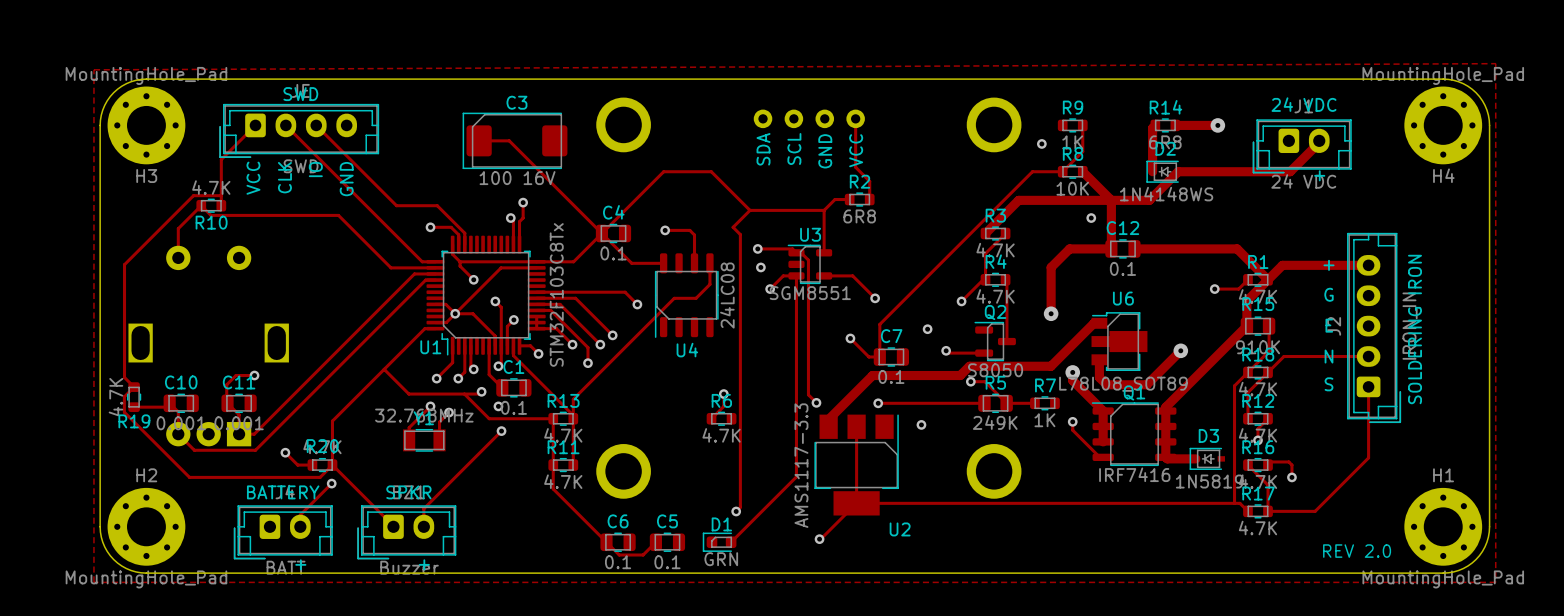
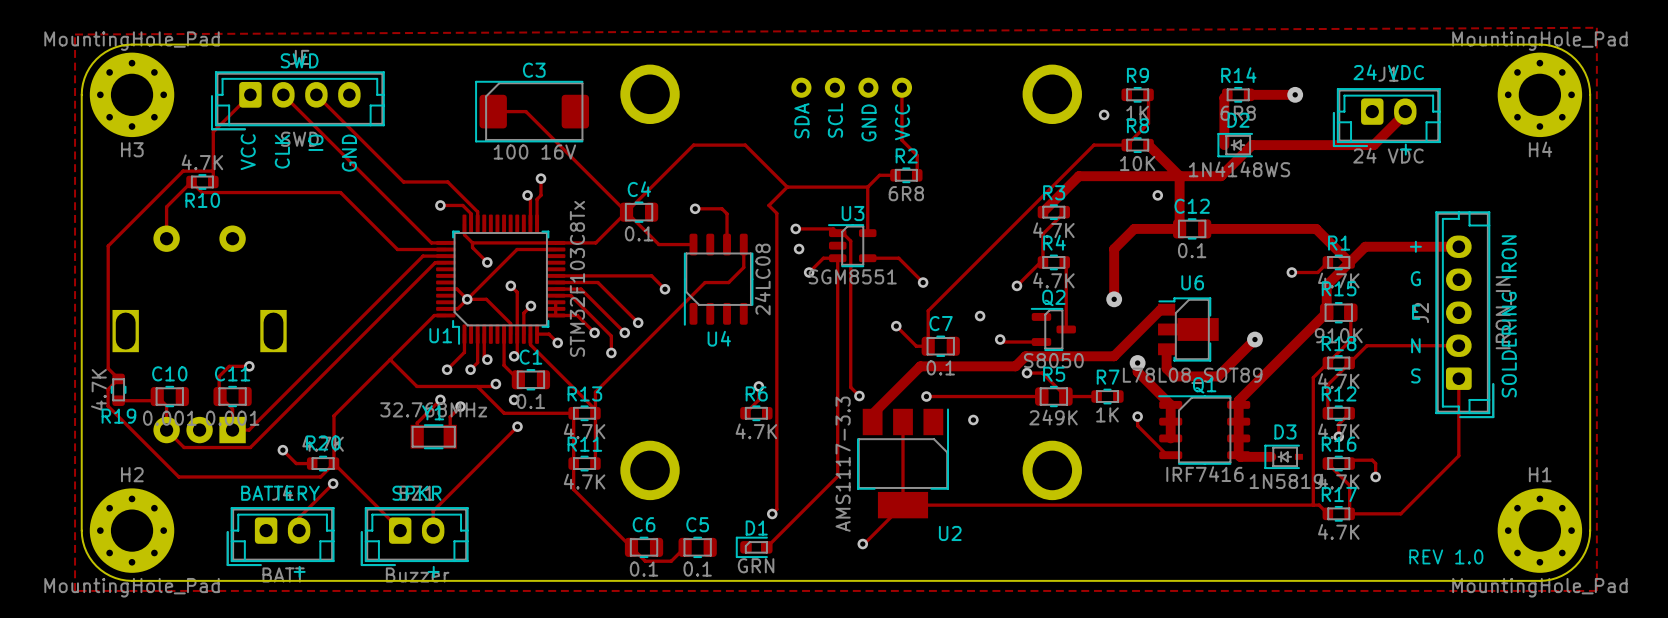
text: REV 2.0 (1357, 551) -> REV 1.0 (1446, 556)

